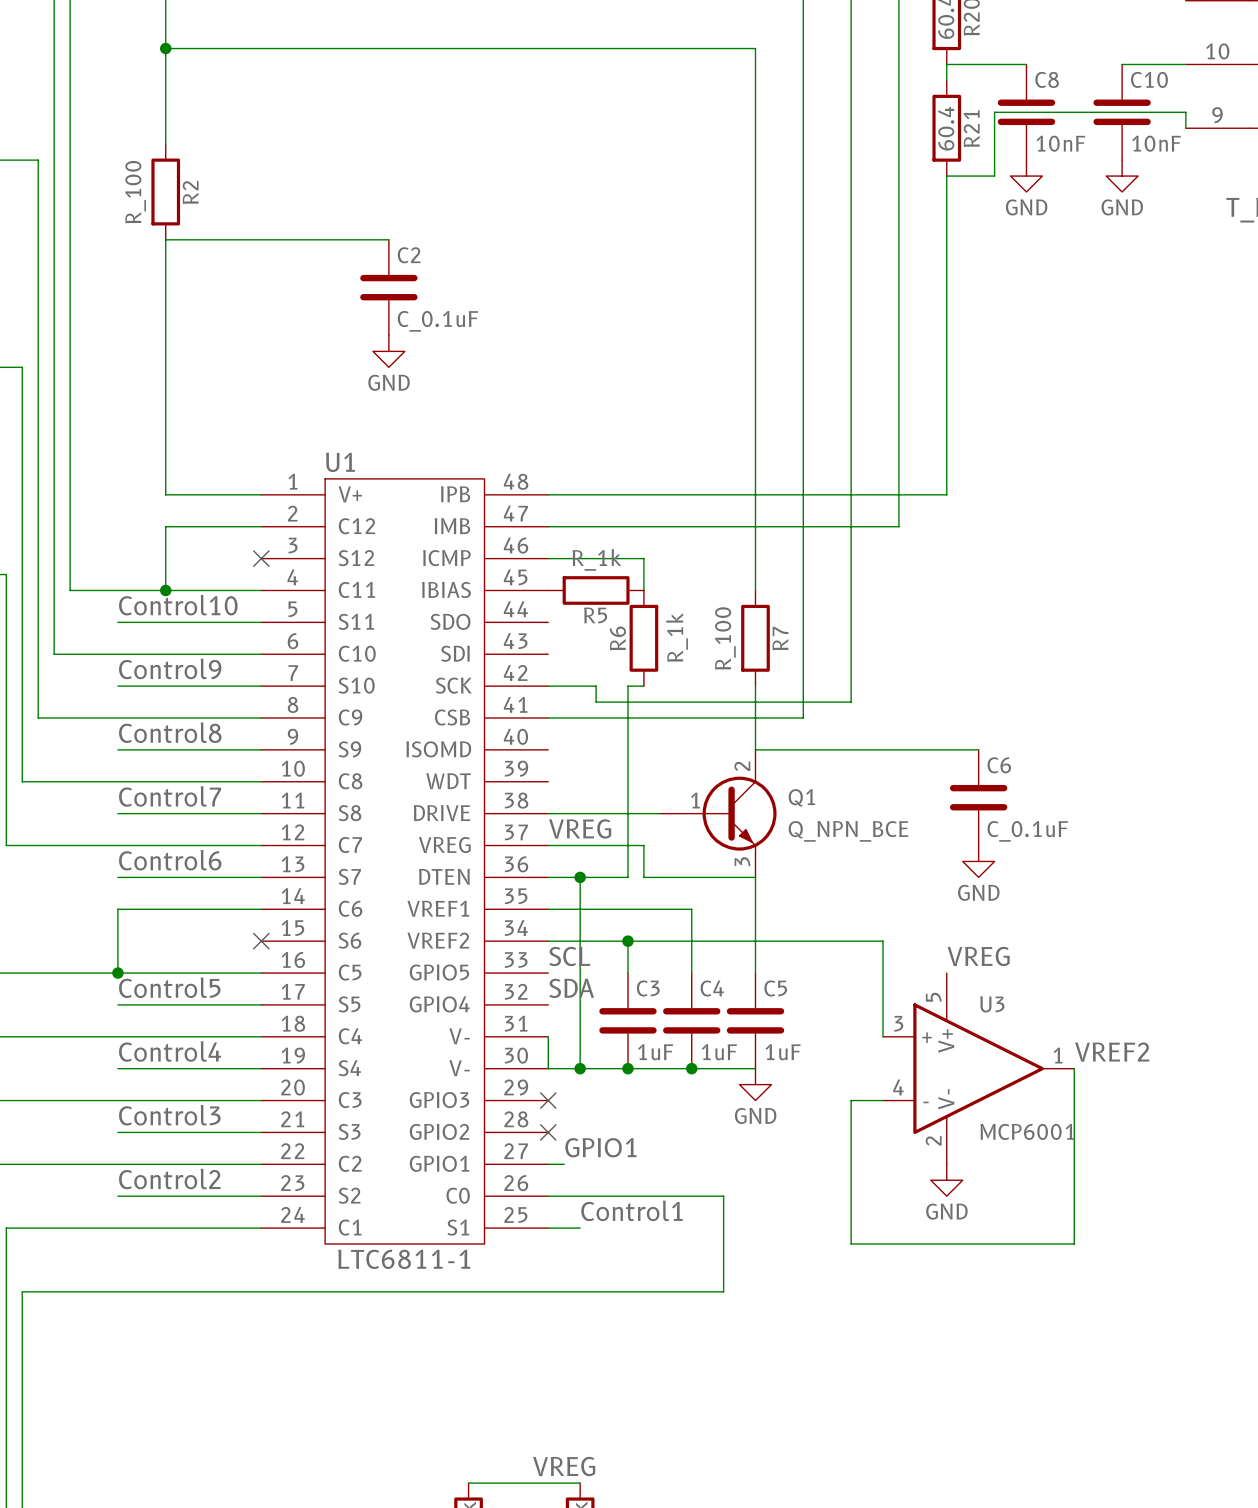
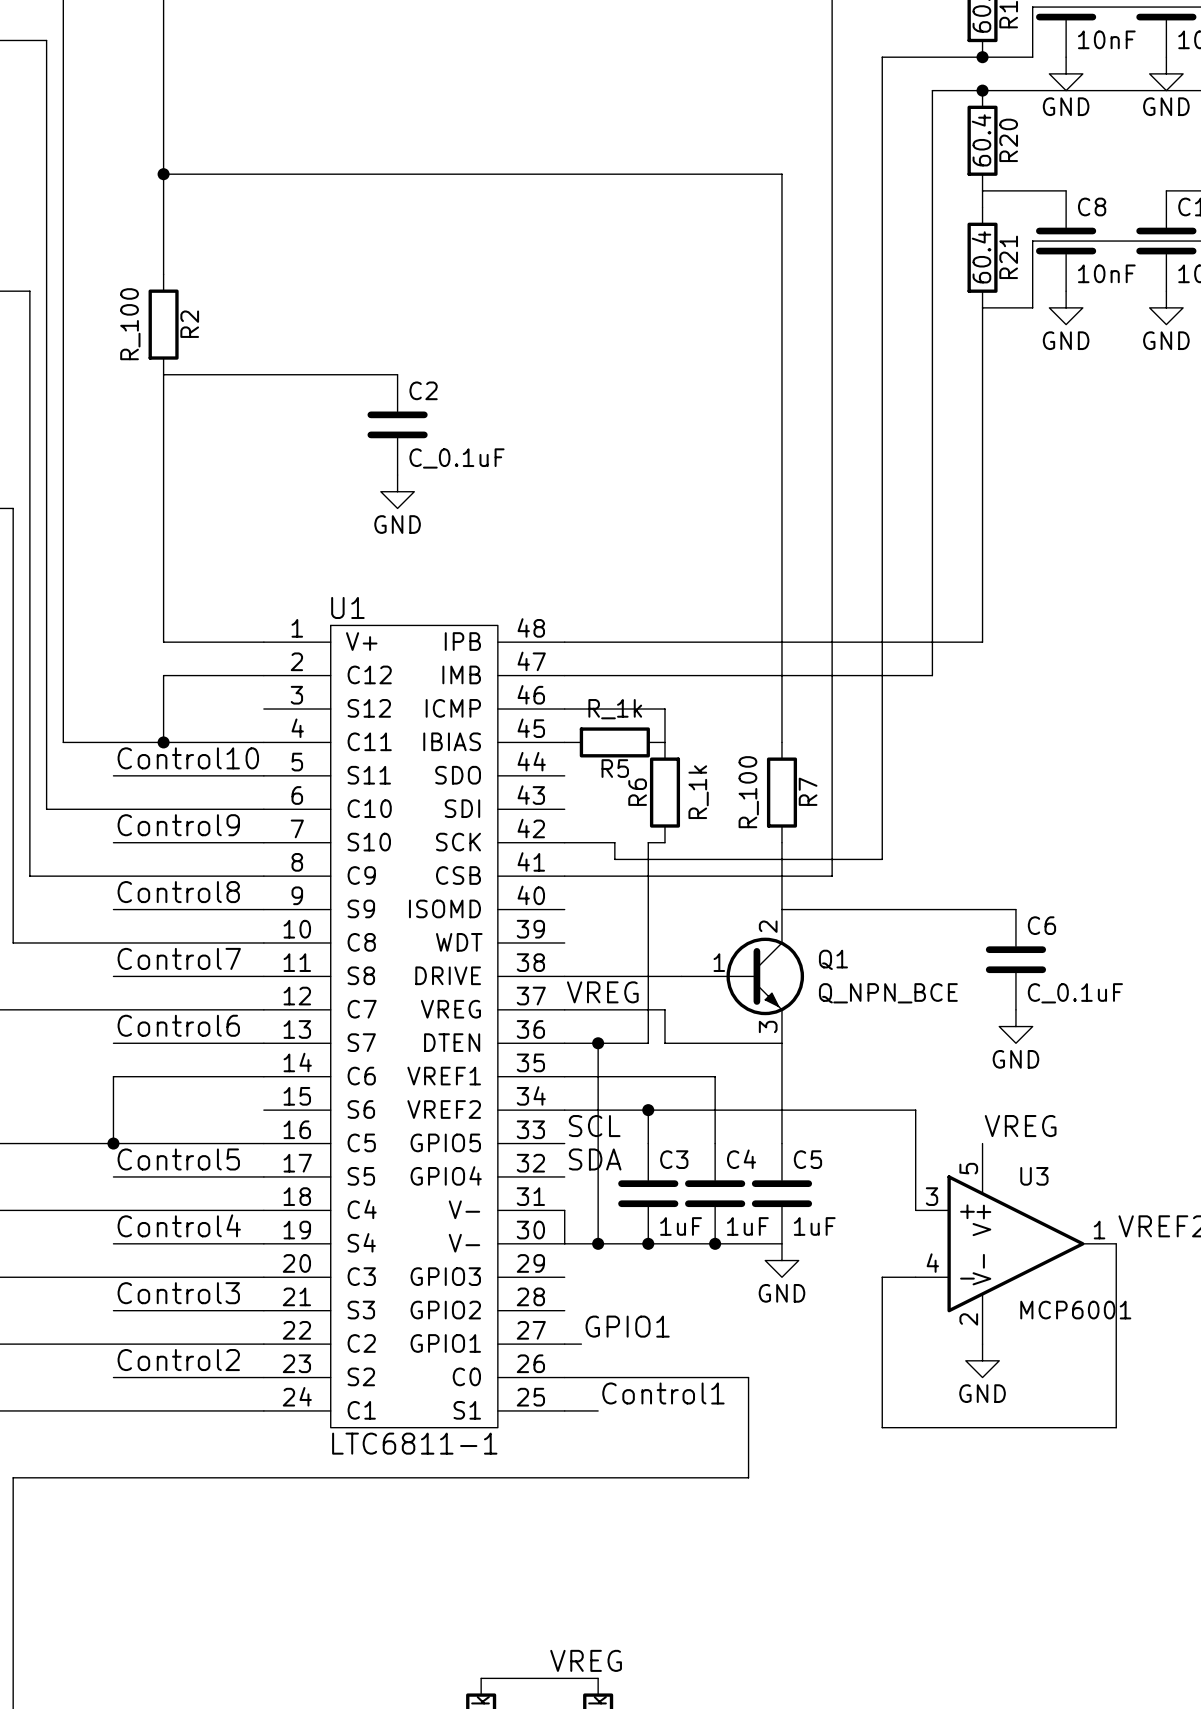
no-connect mark: (261, 558) -> none
no-connect mark: (261, 941) -> none
no-connect mark: (548, 1100) -> none
no-connect mark: (548, 1132) -> none

